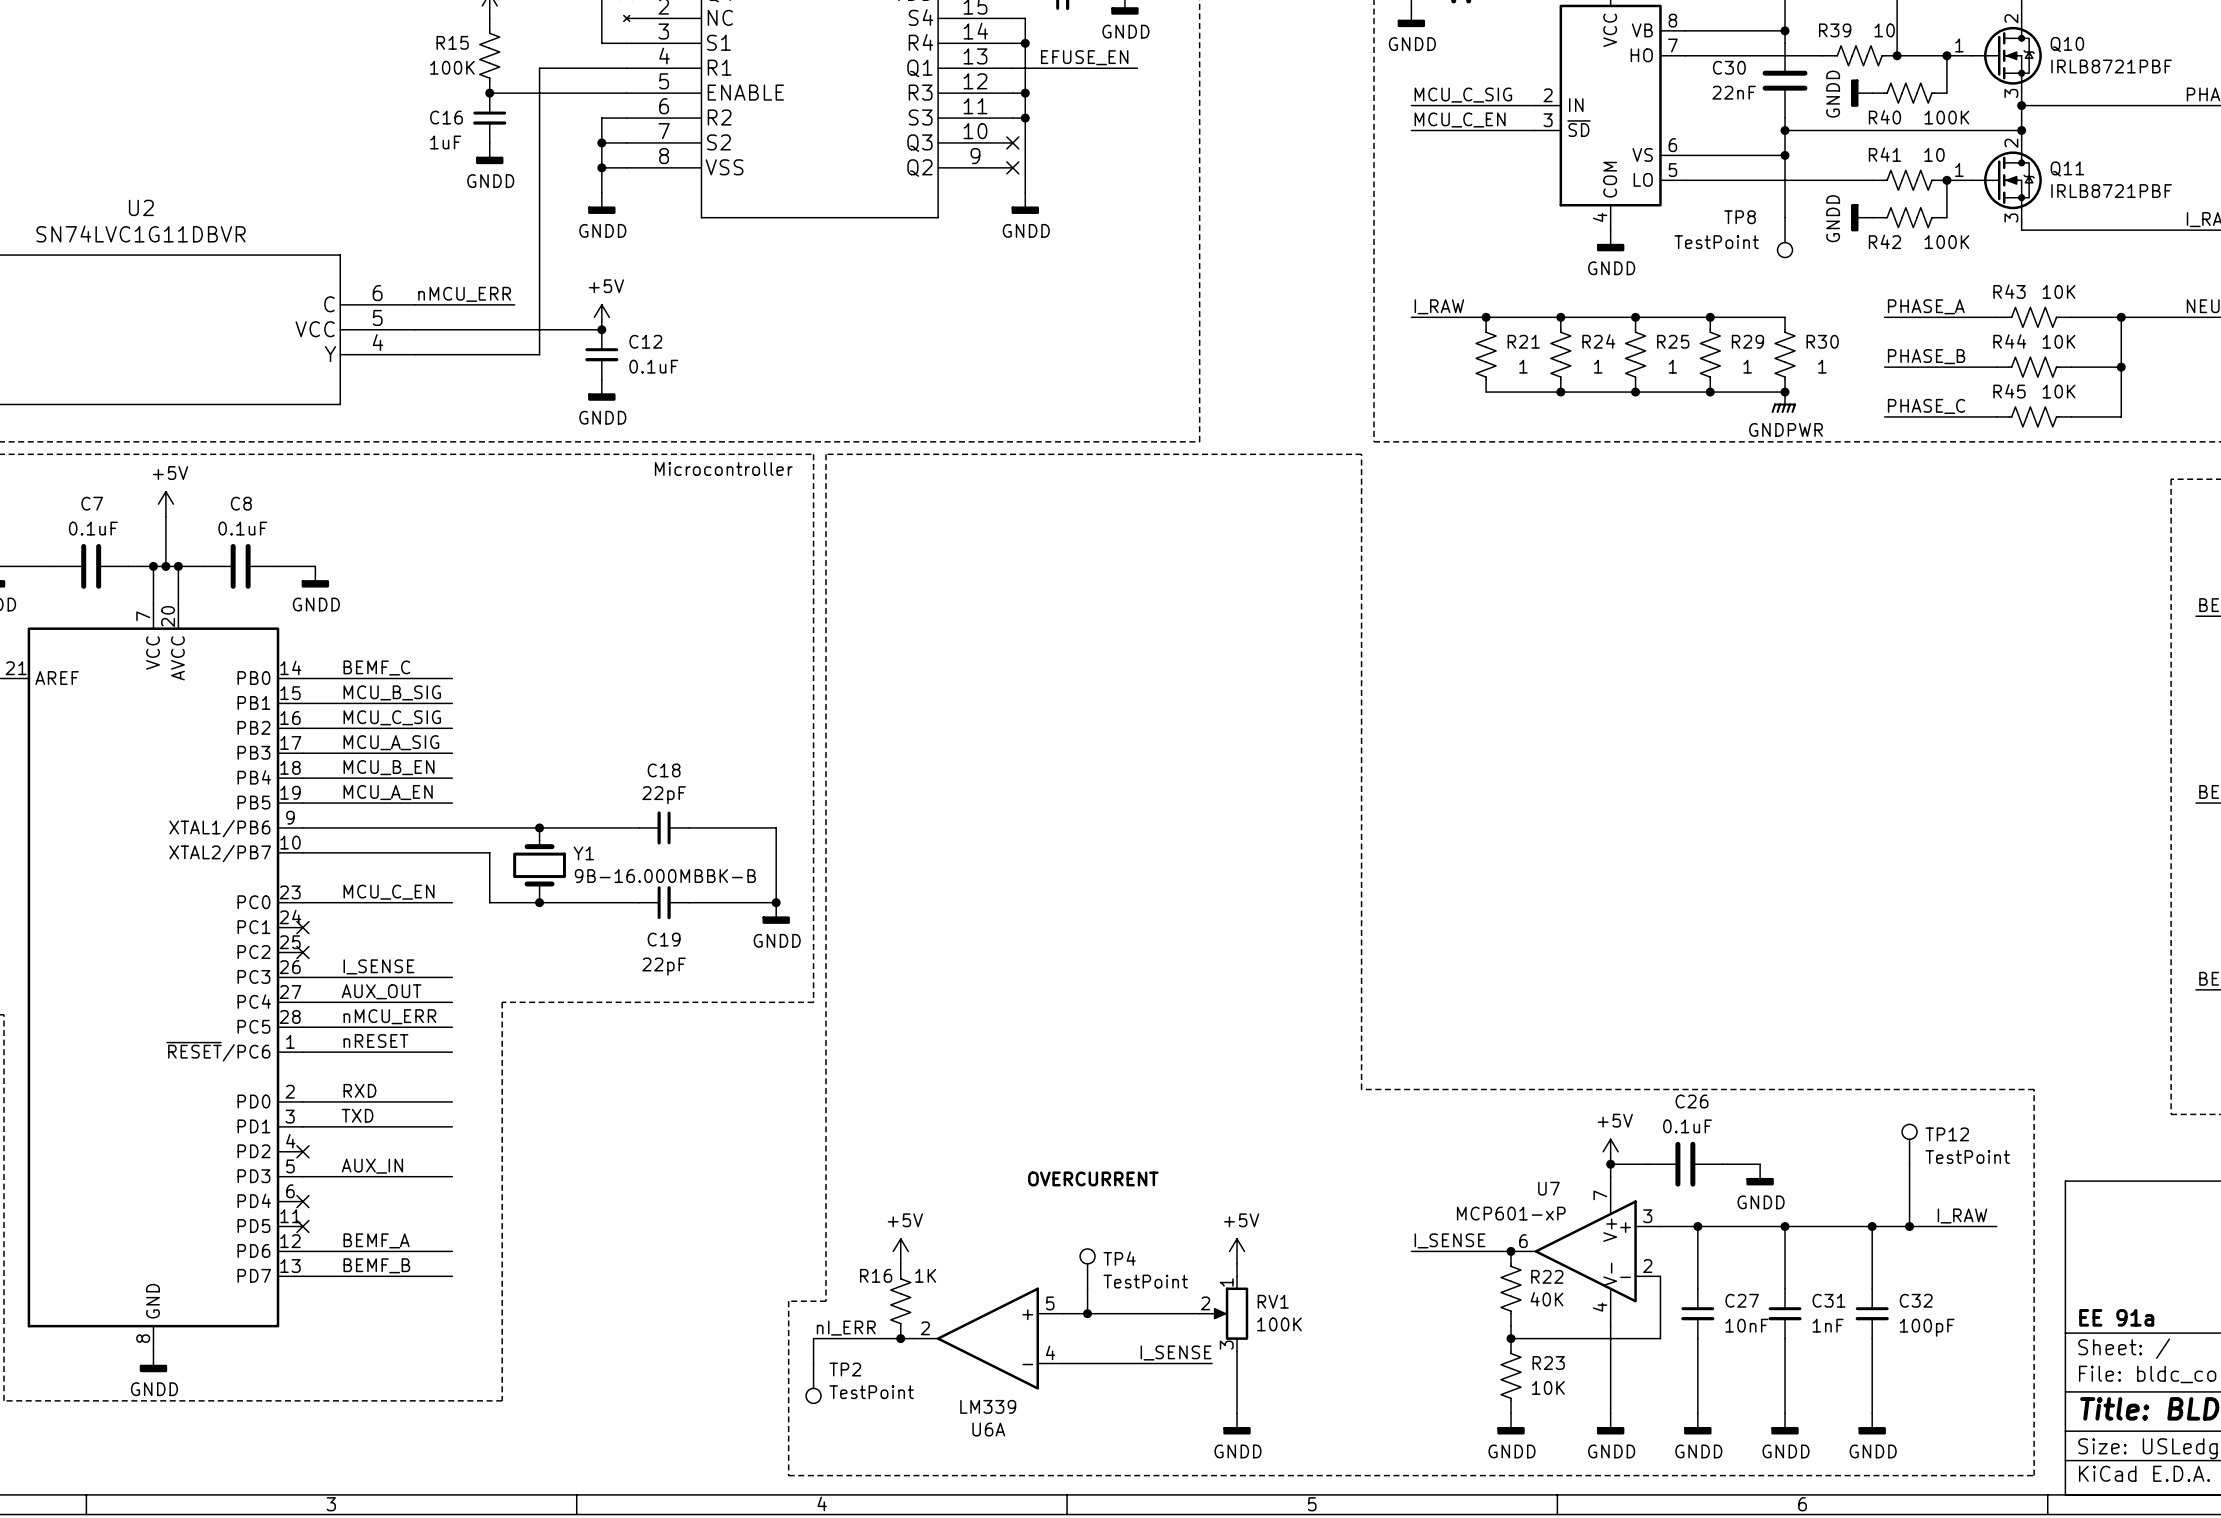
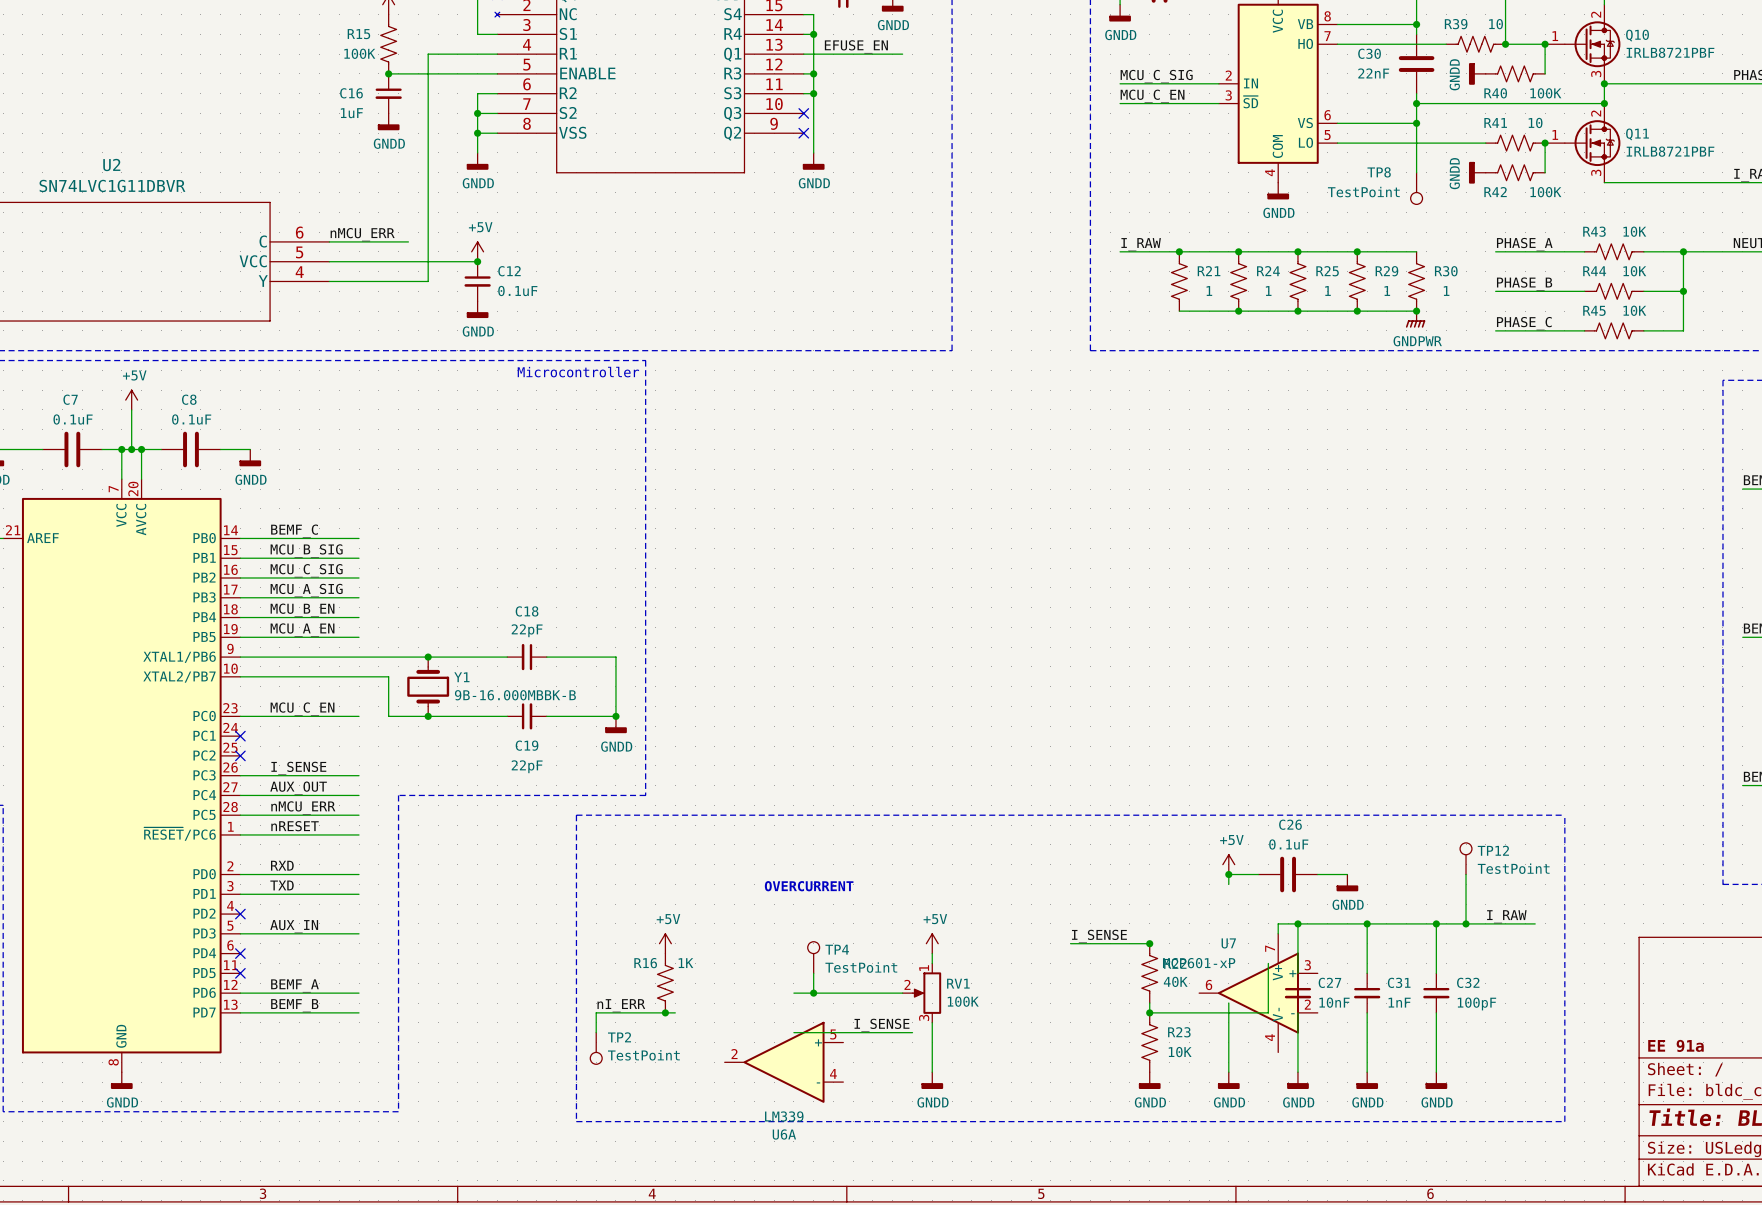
line: (826, 454) (1361, 454) (1361, 1089) (2034, 1089) (2034, 1475) (788, 1475) (788, 1301) (826, 1301) (826, 454) -> none
line: none -> (576, 815) (1564, 815) (1564, 1121) (576, 1121) (576, 815)
junction: none -> (1228, 874)
wire: none -> (1258, 874) (1228, 874) (1228, 884)
wire: none -> (1317, 874) (1347, 874)
TP12 position: (1909, 1144) -> (1466, 858)
power symbol position: +5V (1610, 1151) -> +5V (1228, 864)
junction position: (1610, 1164) -> (1297, 923)
wire: none -> (1307, 923) (1367, 923) (1367, 973)
C26 position: (1685, 1164) -> (1288, 874)
junction: none -> (1367, 923)
wire: none -> (1396, 923) (1535, 923)
junction: none -> (1436, 923)
junction: none -> (1466, 923)
wire: (1909, 1164) (1909, 1226) -> (1466, 874) (1466, 923)
power symbol position: GNDD (1760, 1174) -> GNDD (1347, 882)
text position: OVERCURRENT (1093, 1178) -> OVERCURRENT (809, 886)
junction: none -> (1149, 943)
label position: I_RAW (1962, 1215) -> I_RAW (1506, 916)
wire: (1660, 1226) (1996, 1226) -> none
wire: (1697, 1226) (1697, 1288) -> (1297, 923) (1297, 973)
junction: (1697, 1226) -> none
wire: (1785, 1226) (1785, 1288) -> none
junction: (1785, 1226) -> none
wire: (1872, 1226) (1872, 1288) -> (1436, 923) (1436, 973)
junction: (1872, 1226) -> none
junction: (1909, 1226) -> none
label position: I_SENSE (1450, 1240) -> I_SENSE (1099, 936)
power symbol position: +5V (900, 1251) -> +5V (665, 943)
junction: none -> (813, 993)
power symbol position: +5V (1237, 1251) -> +5V (932, 943)
wire: (1411, 1251) (1511, 1251) -> (1070, 943) (1149, 943)
junction: (1511, 1251) -> none
wire: (1237, 1263) (1237, 1276) -> (932, 953) (932, 963)
TP4 position: (1087, 1268) -> (813, 957)
junction: none -> (665, 1012)
junction: none -> (1149, 1012)
wire: (1660, 1276) (1660, 1338) (1511, 1338) (1511, 1326) -> (1268, 963) (1268, 1012) (1149, 1012) (1149, 1003)
wire: (1087, 1288) (1087, 1313) -> (813, 973) (813, 993)
R22 position: (1511, 1288) -> (1149, 973)
R16 position: (900, 1301) -> (665, 983)
wire: (1062, 1313) (1199, 1313) -> (793, 993) (902, 993)
junction: (1087, 1313) -> none
RV1 position: (1223, 1313) -> (921, 993)
C27 position: (1697, 1313) -> (1297, 993)
C31 position: (1785, 1313) -> (1367, 993)
C32 position: (1872, 1313) -> (1436, 993)
wire: (1610, 1326) (1610, 1413) -> (1228, 1003) (1228, 1072)
label position: nI_ERR (846, 1328) -> nI_ERR (621, 1005)
junction: (900, 1338) -> none
wire: (913, 1338) (813, 1338) (813, 1363) -> (675, 1012) (596, 1012) (596, 1032)
junction: (1511, 1338) -> none
wire: (1697, 1338) (1697, 1413) -> (1297, 1012) (1297, 1072)
wire: (1785, 1338) (1785, 1413) -> (1367, 1012) (1367, 1072)
wire: (1872, 1338) (1872, 1413) -> (1436, 1012) (1436, 1072)
wire: (1237, 1351) (1237, 1413) -> (932, 1022) (932, 1072)
label position: I_SENSE (1176, 1352) -> I_SENSE (882, 1025)
power symbol: none -> GNDD (1149, 1080)
power symbol: none -> GNDD (1228, 1080)
power symbol: none -> GNDD (1297, 1080)
power symbol: none -> GNDD (1367, 1080)
power symbol: none -> GNDD (1436, 1080)
wire: (1062, 1363) (1212, 1363) -> (793, 1032) (912, 1032)
R23 position: (1511, 1375) -> (1149, 1042)
TP2 position: (813, 1383) -> (596, 1048)
power symbol position: GNDD (1237, 1423) -> GNDD (932, 1080)
power symbol: GNDD (1511, 1423) -> none
power symbol: GNDD (1610, 1423) -> none
power symbol: GNDD (1697, 1423) -> none
power symbol: GNDD (1785, 1423) -> none
power symbol: GNDD (1872, 1423) -> none

